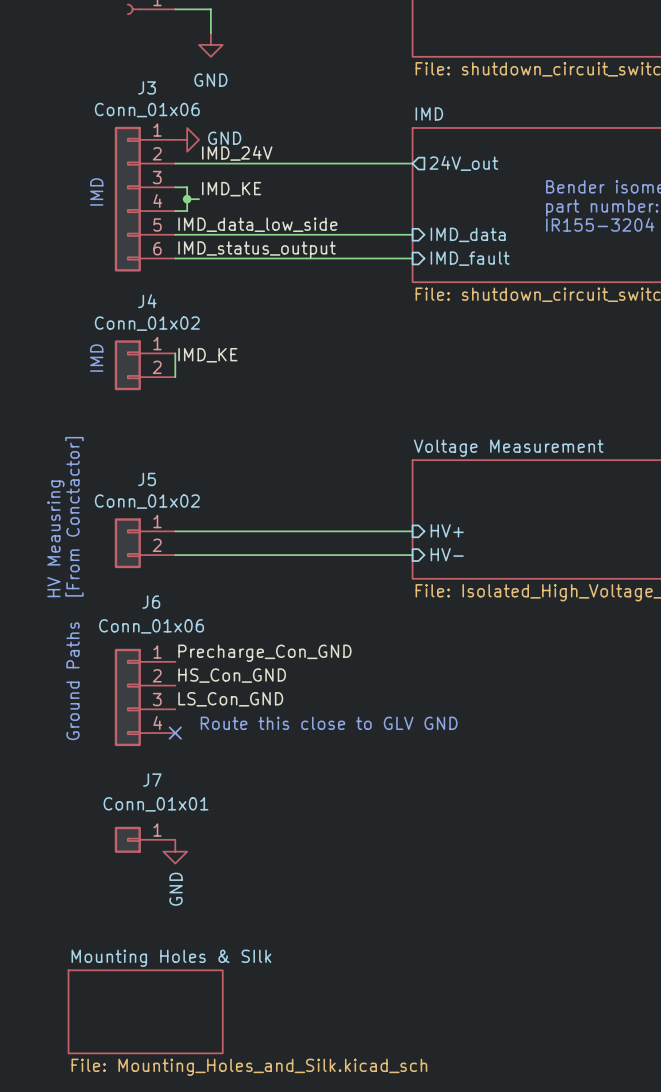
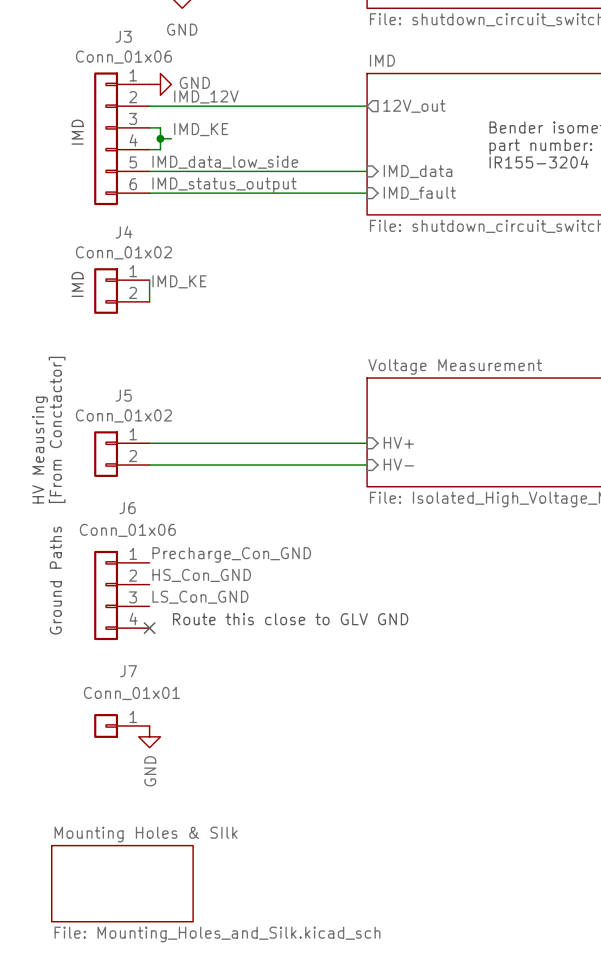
label: IMD_24V (237, 153) -> IMD_12V (206, 96)
sheet pin: 24V_out (463, 163) -> 12V_out (414, 106)

